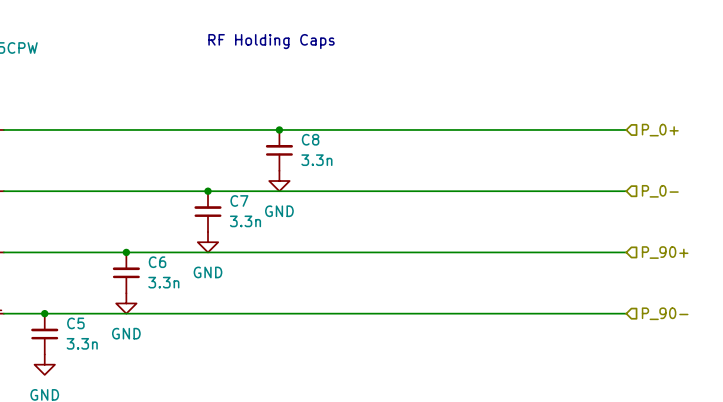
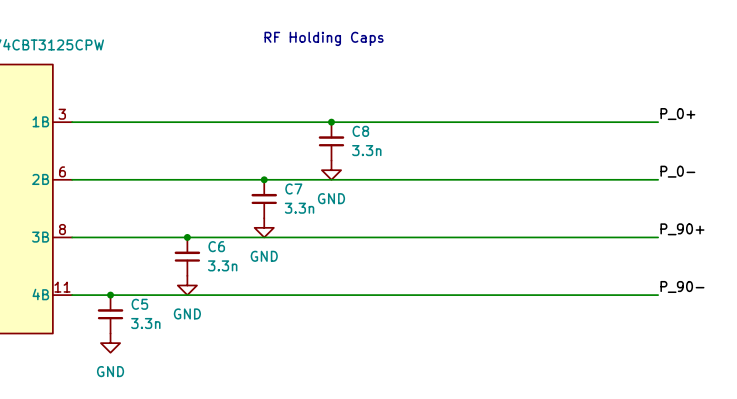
label: none -> P_0+ (677, 114)
hierarchical label: P_0+ (660, 130) -> none
label: none -> P_0- (677, 171)
hierarchical label: P_0- (660, 191) -> none
label: none -> P_90+ (682, 229)
hierarchical label: P_90+ (665, 252) -> none
label: none -> P_90- (682, 286)
hierarchical label: P_90- (665, 313) -> none

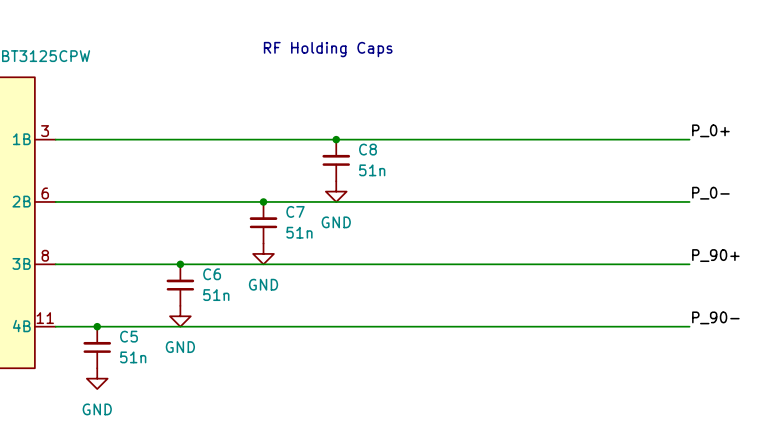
C8 value: 3.3n (366, 150) -> 51n (372, 170)
C7 value: 3.3n (299, 208) -> 51n (299, 232)
C6 value: 3.3n (222, 265) -> 51n (216, 295)
C5 value: 3.3n (145, 323) -> 51n (133, 357)

